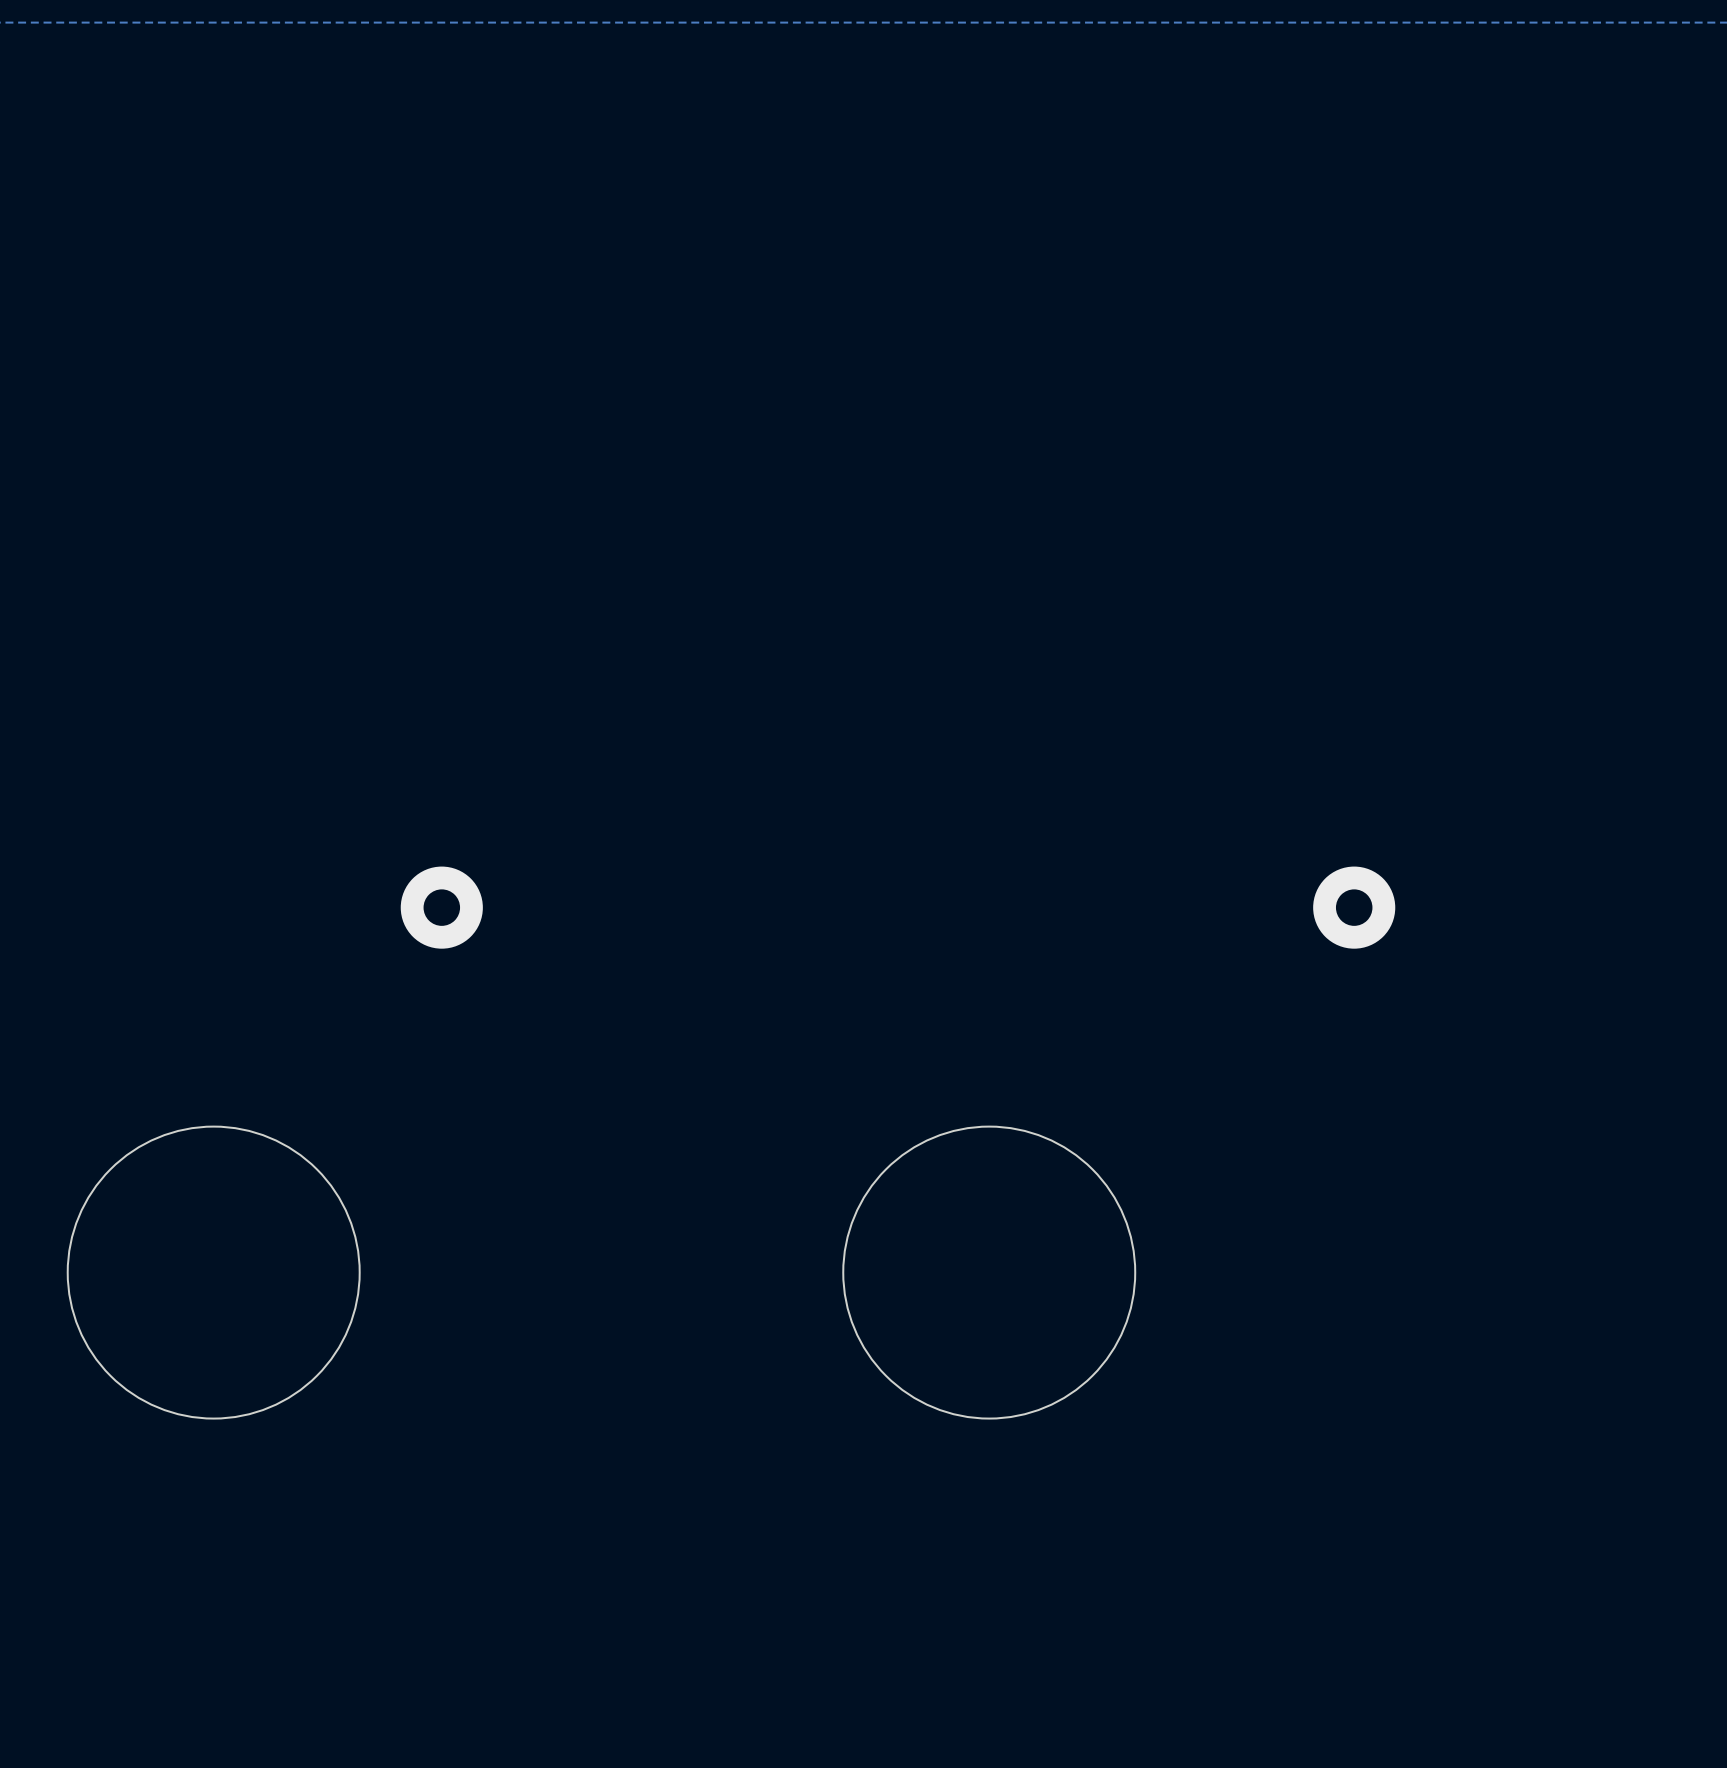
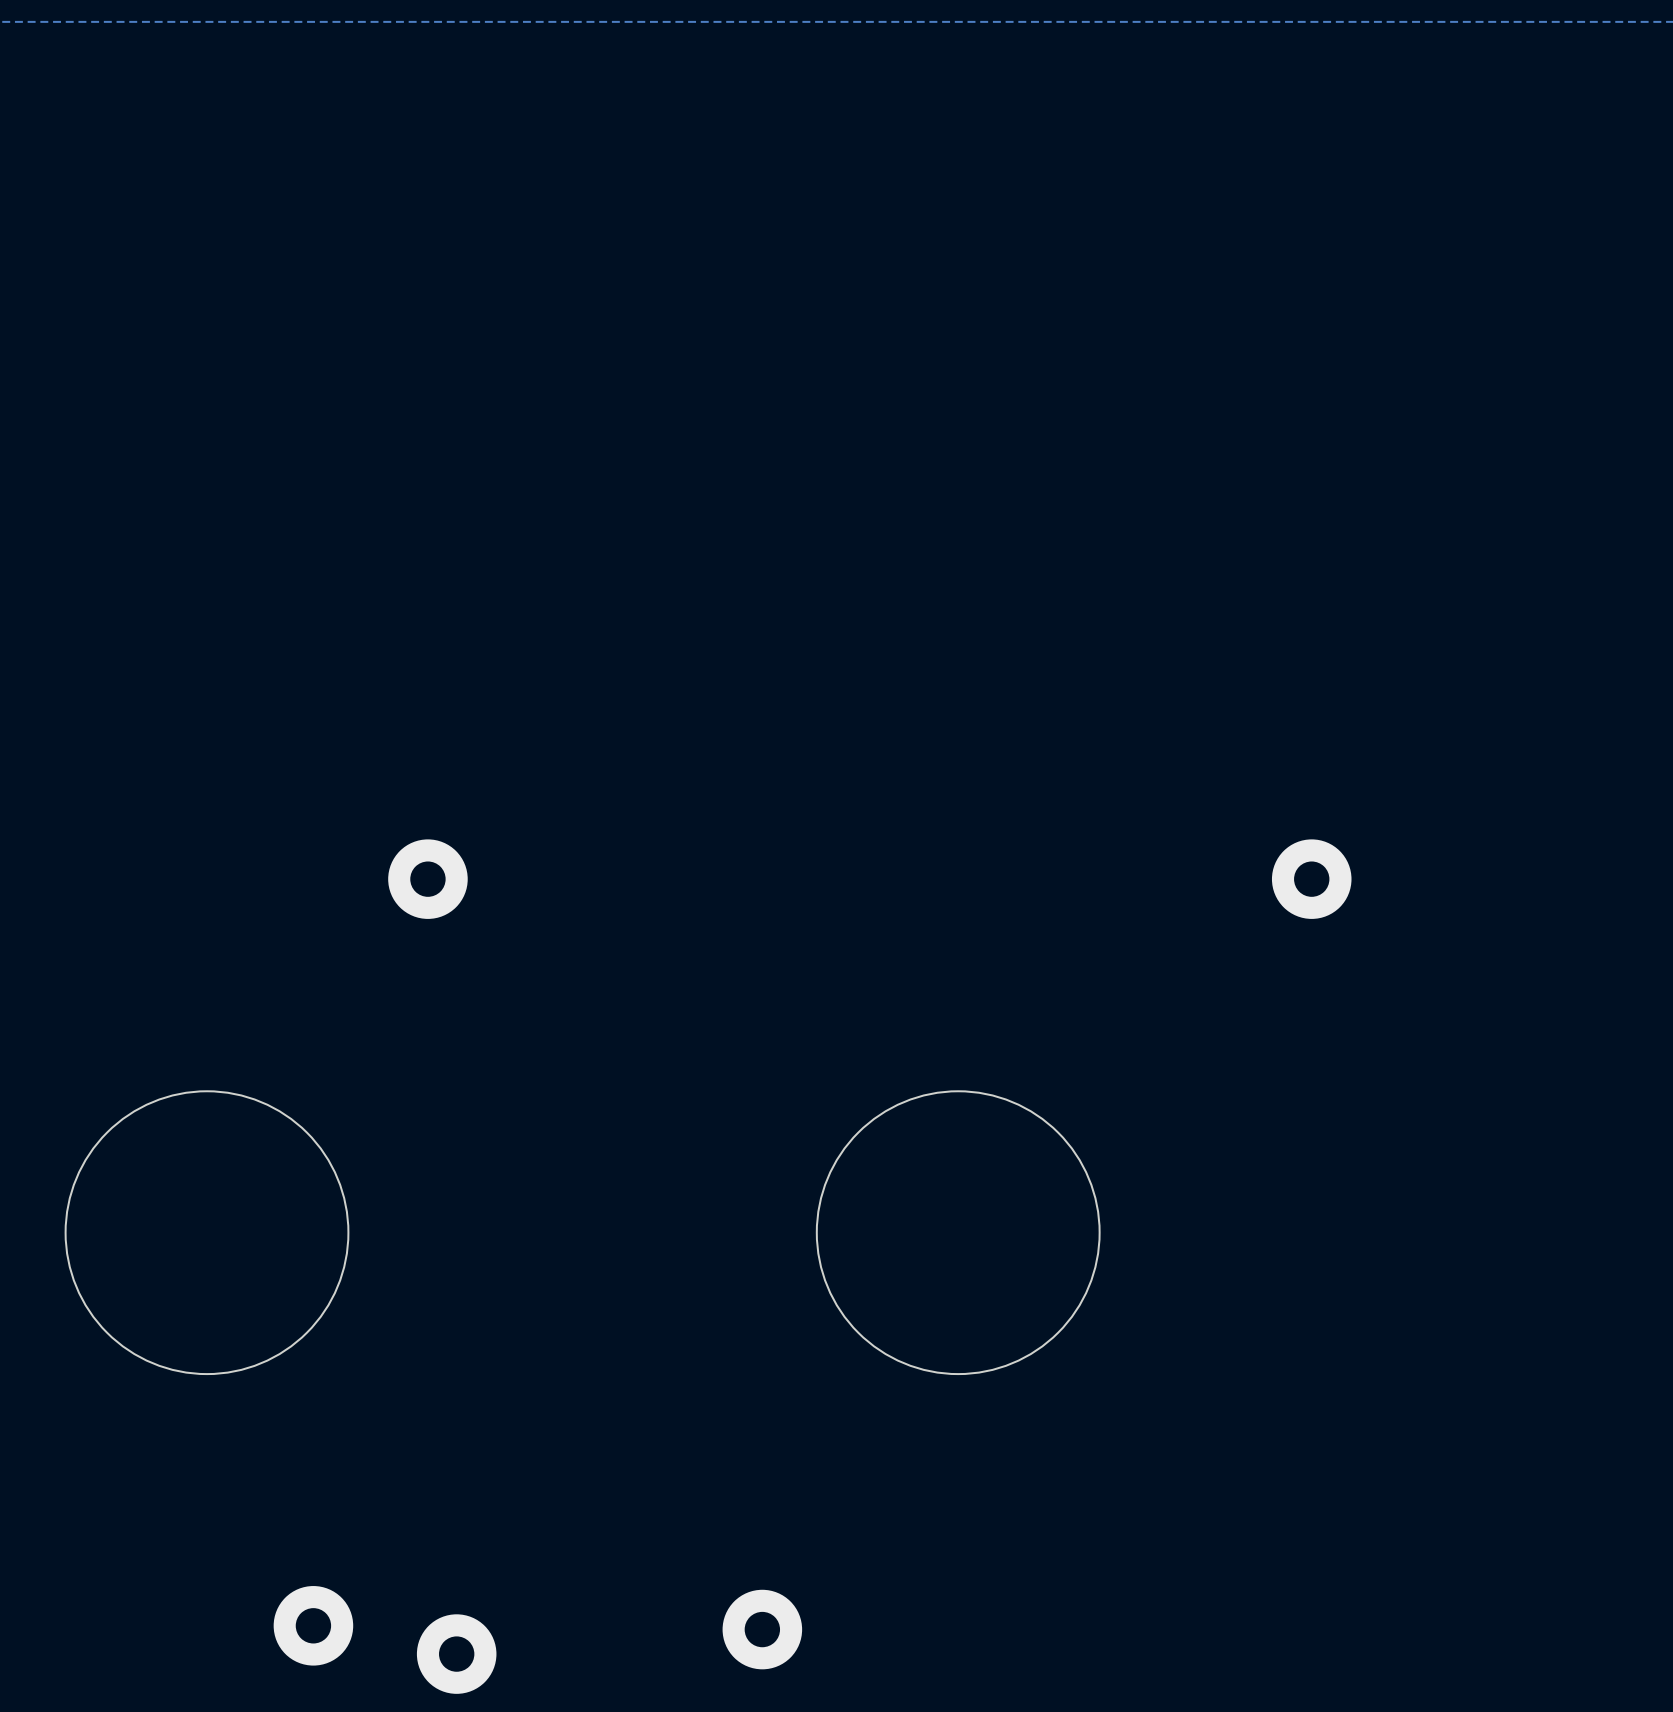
via: none -> (313, 1625)
via: none -> (762, 1629)
via: none -> (456, 1654)

